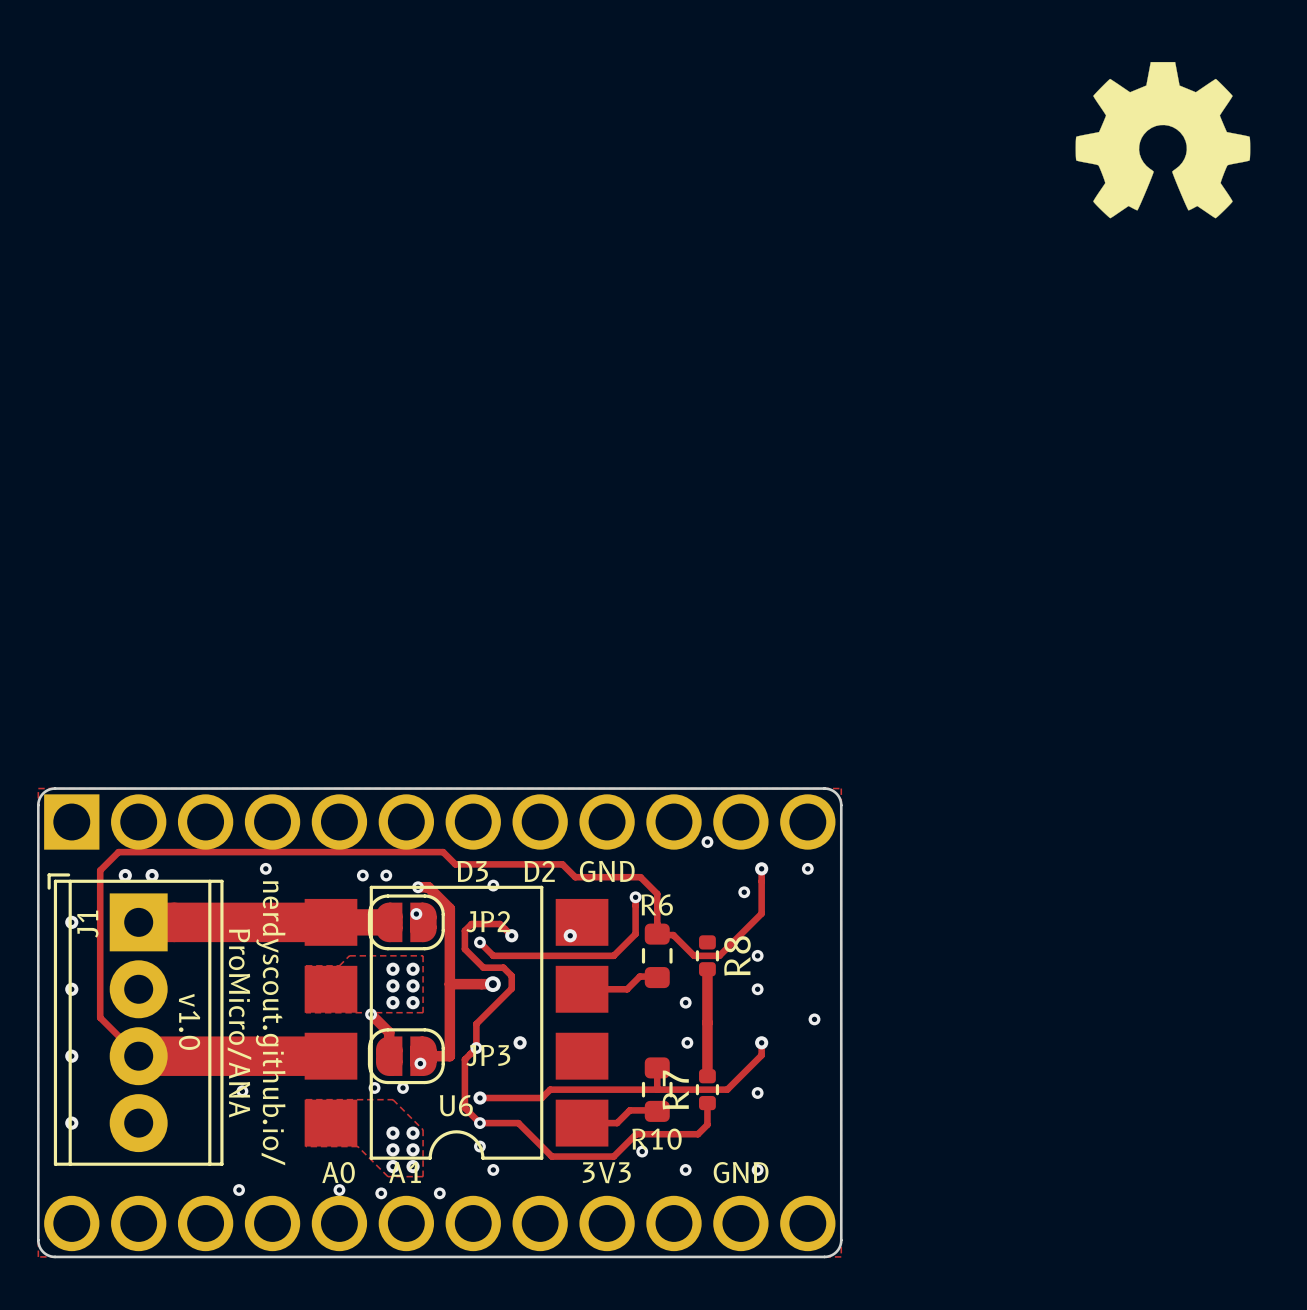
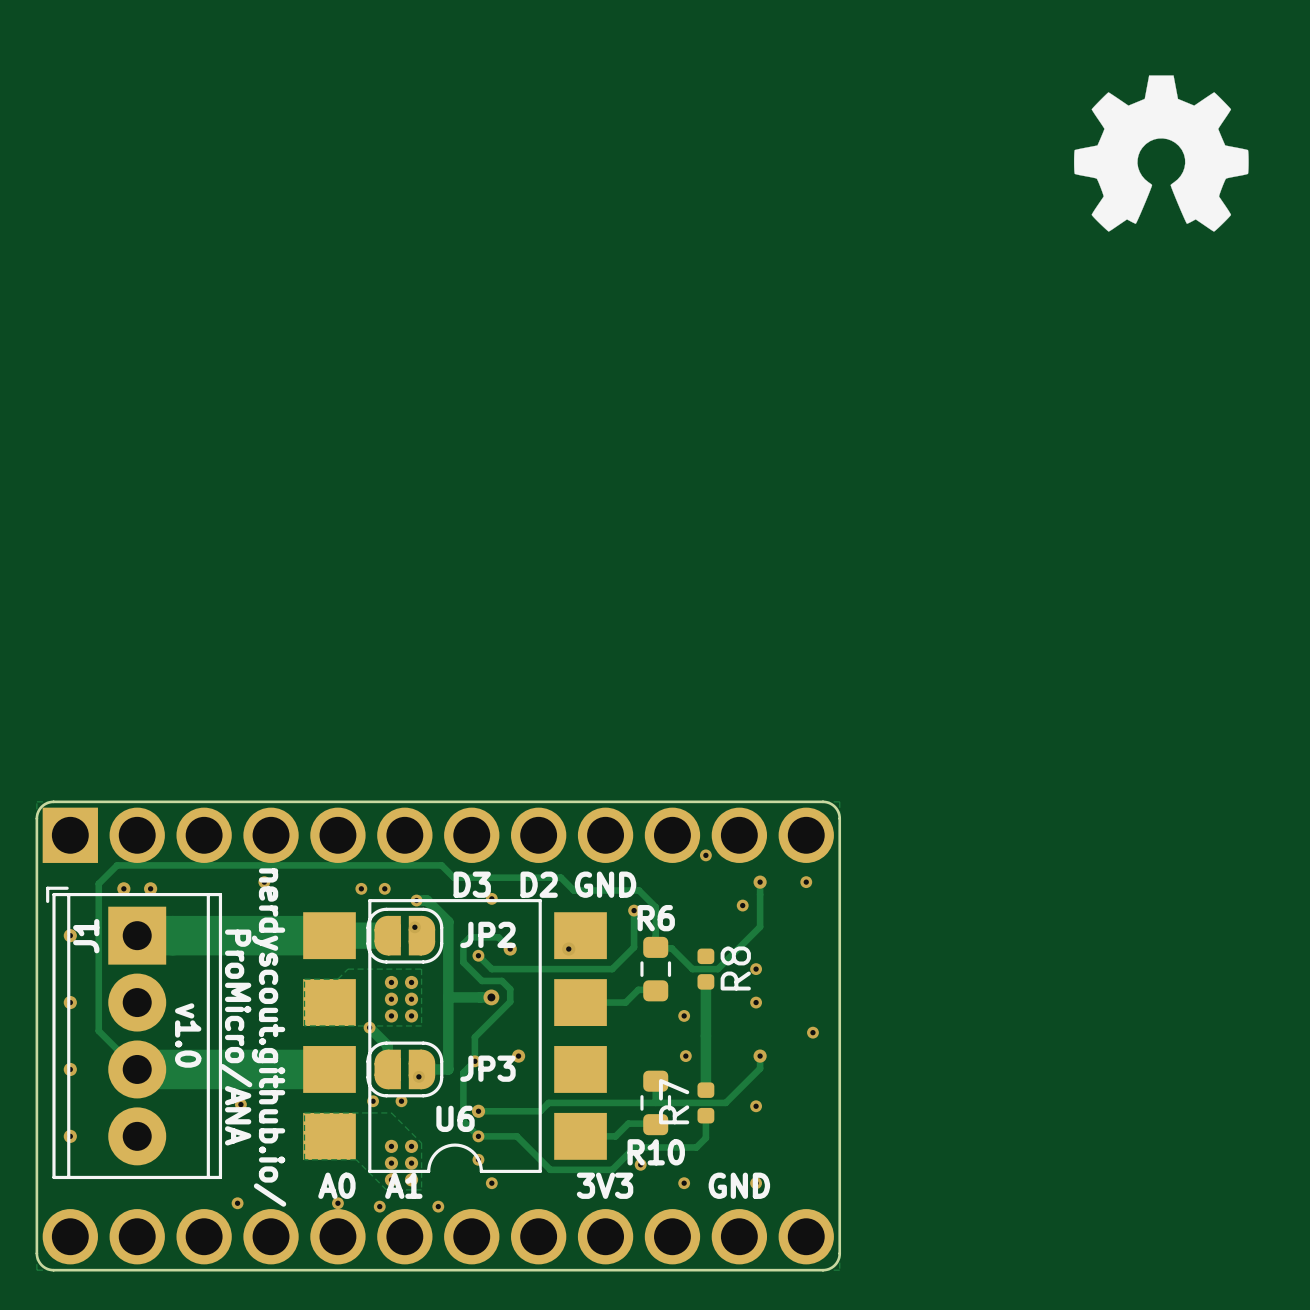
R8 footprint: [695, 935, 720, 977] -> [697, 948, 715, 990]
R7 footprint: [695, 1069, 720, 1111] -> [697, 1082, 715, 1124]

